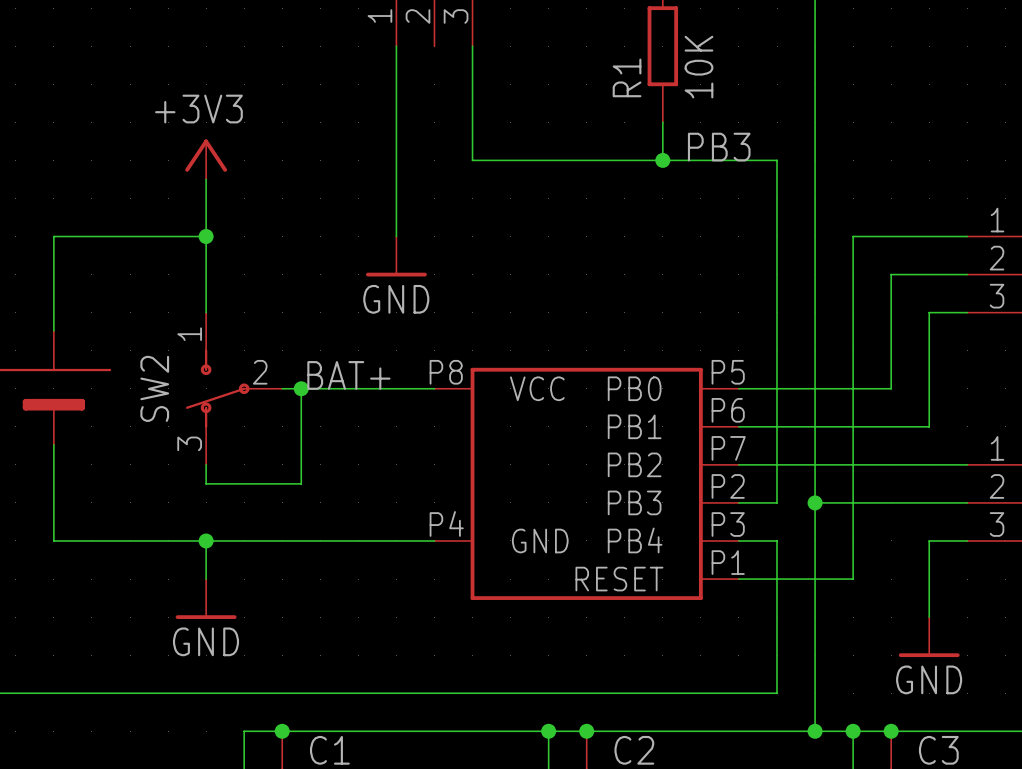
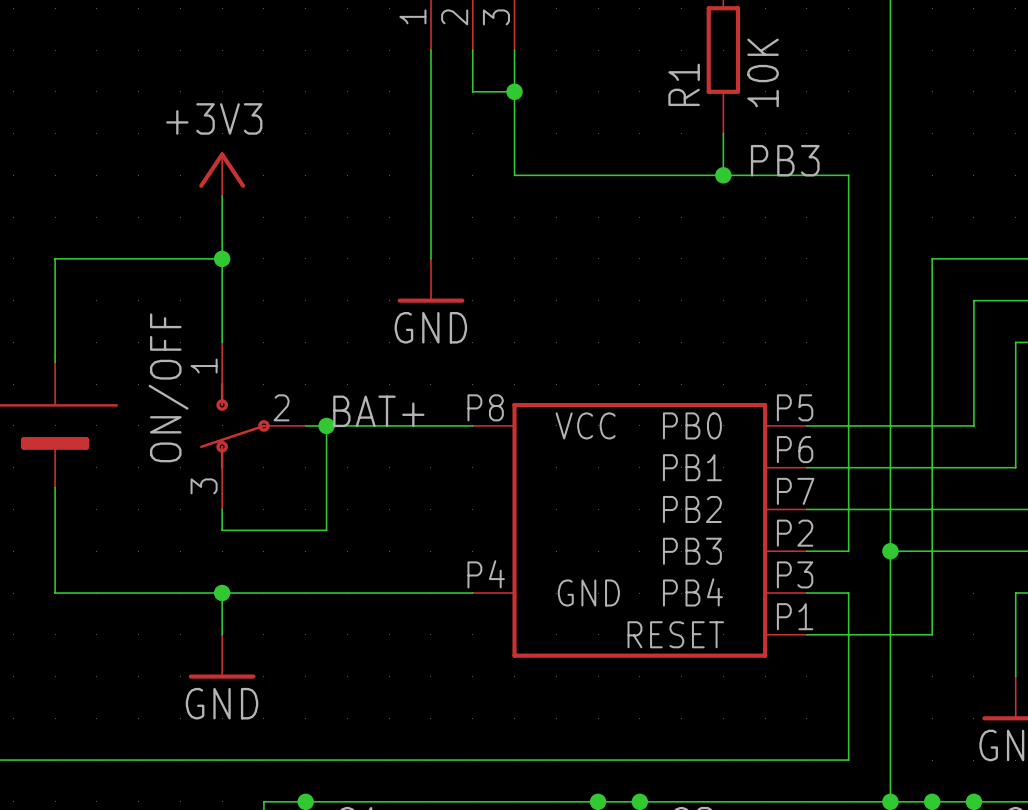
wire: none -> (472, 50) (472, 91) (514, 91)
junction: none -> (514, 91)
SW2 name: SW2 (154, 388) -> ON/OFF (168, 387)

